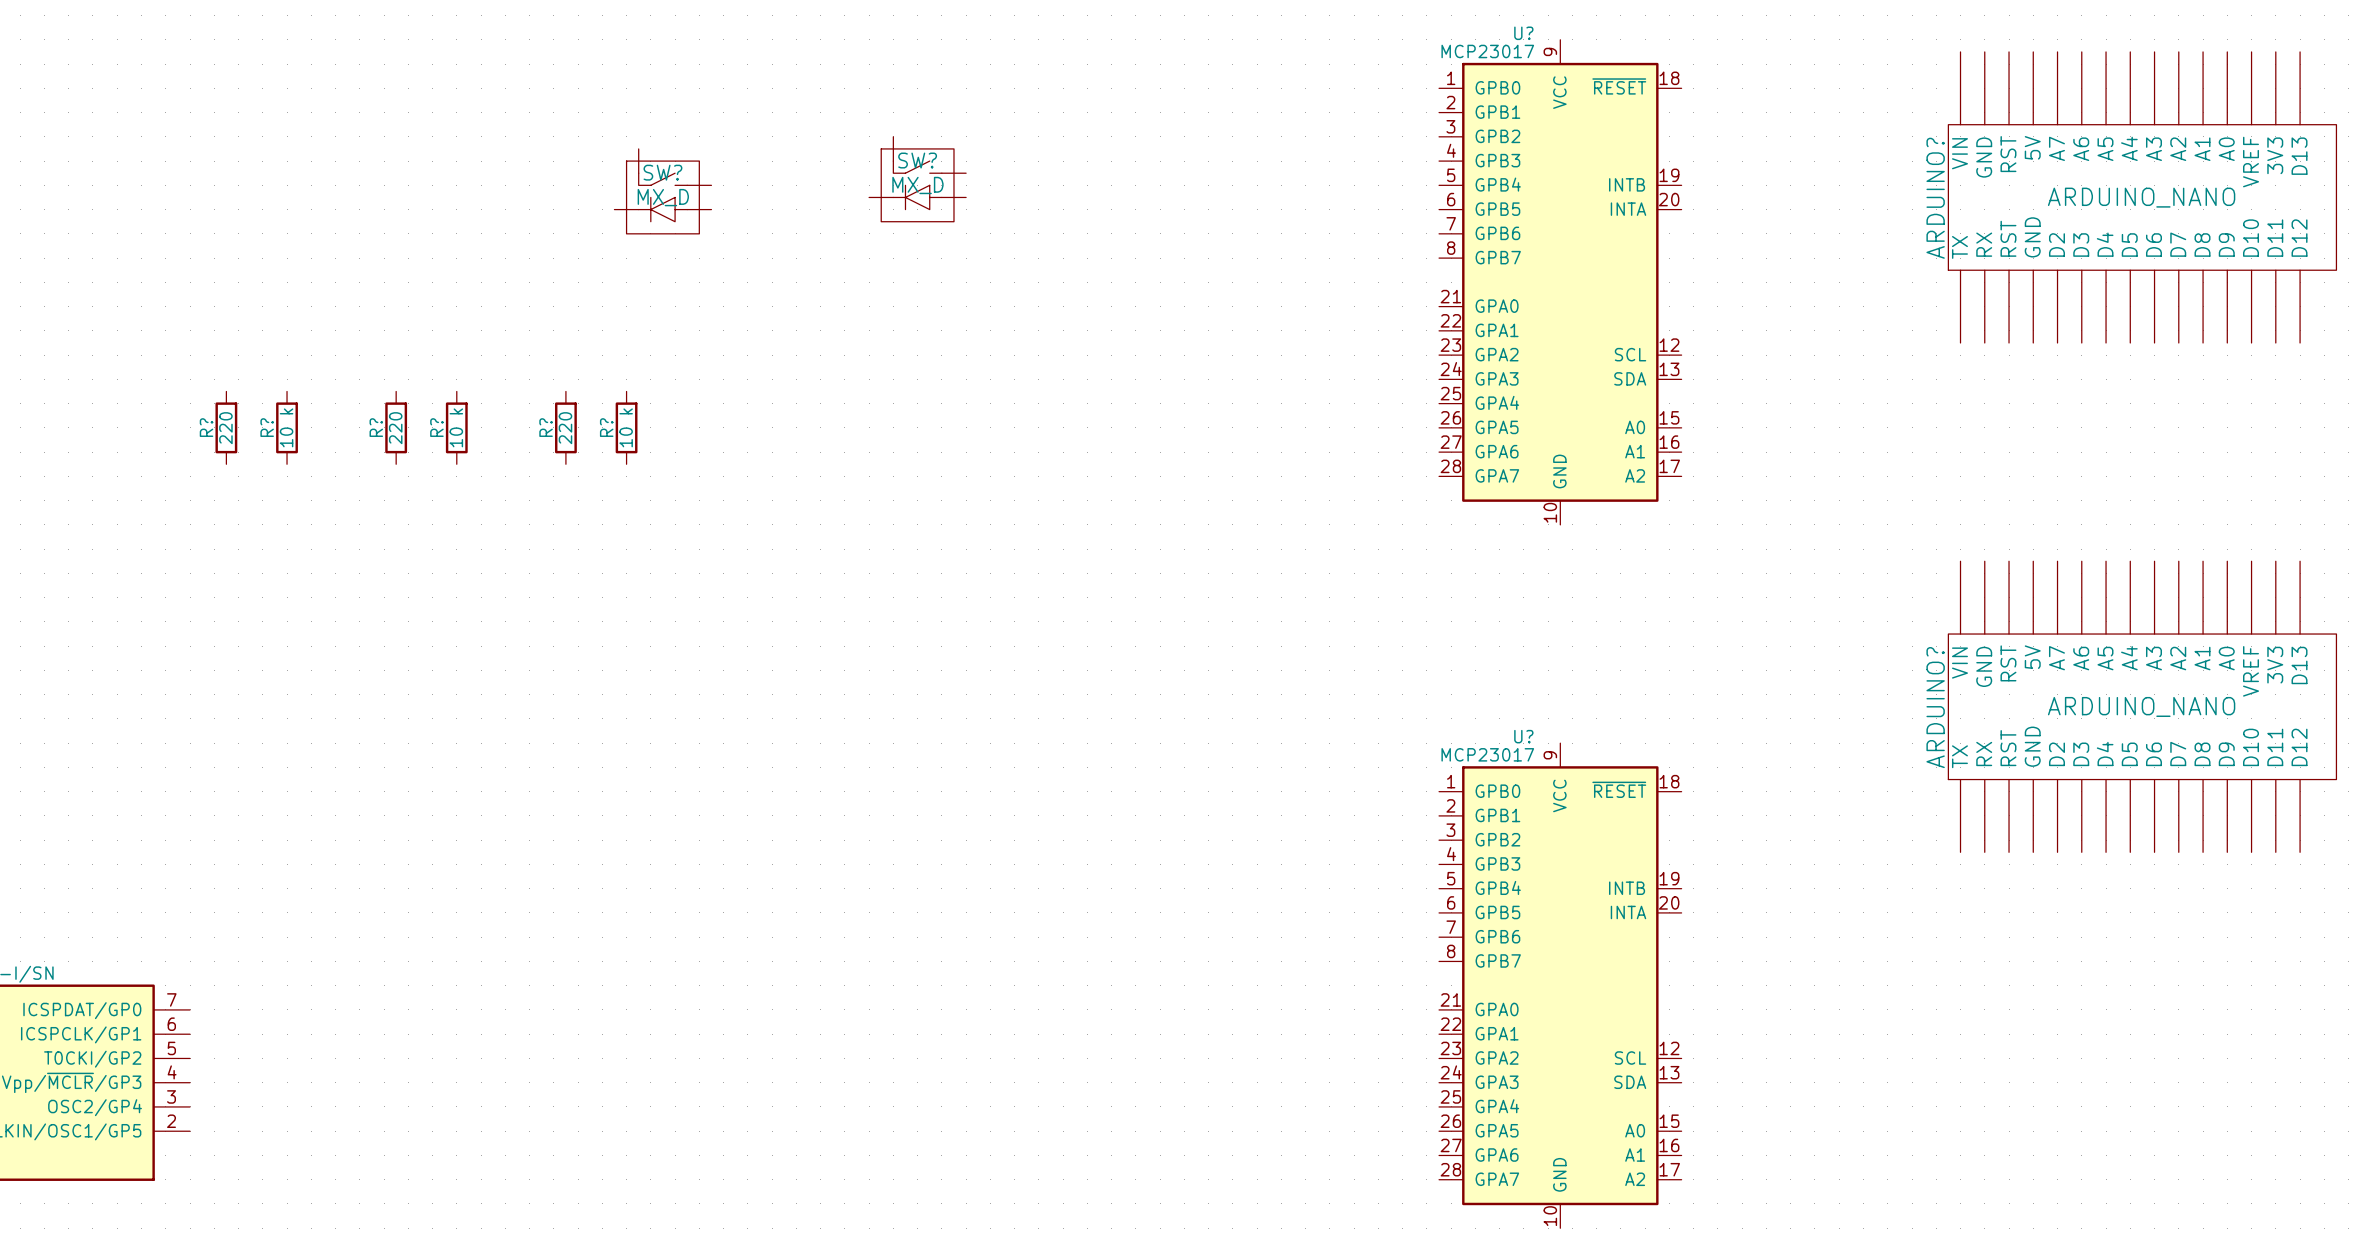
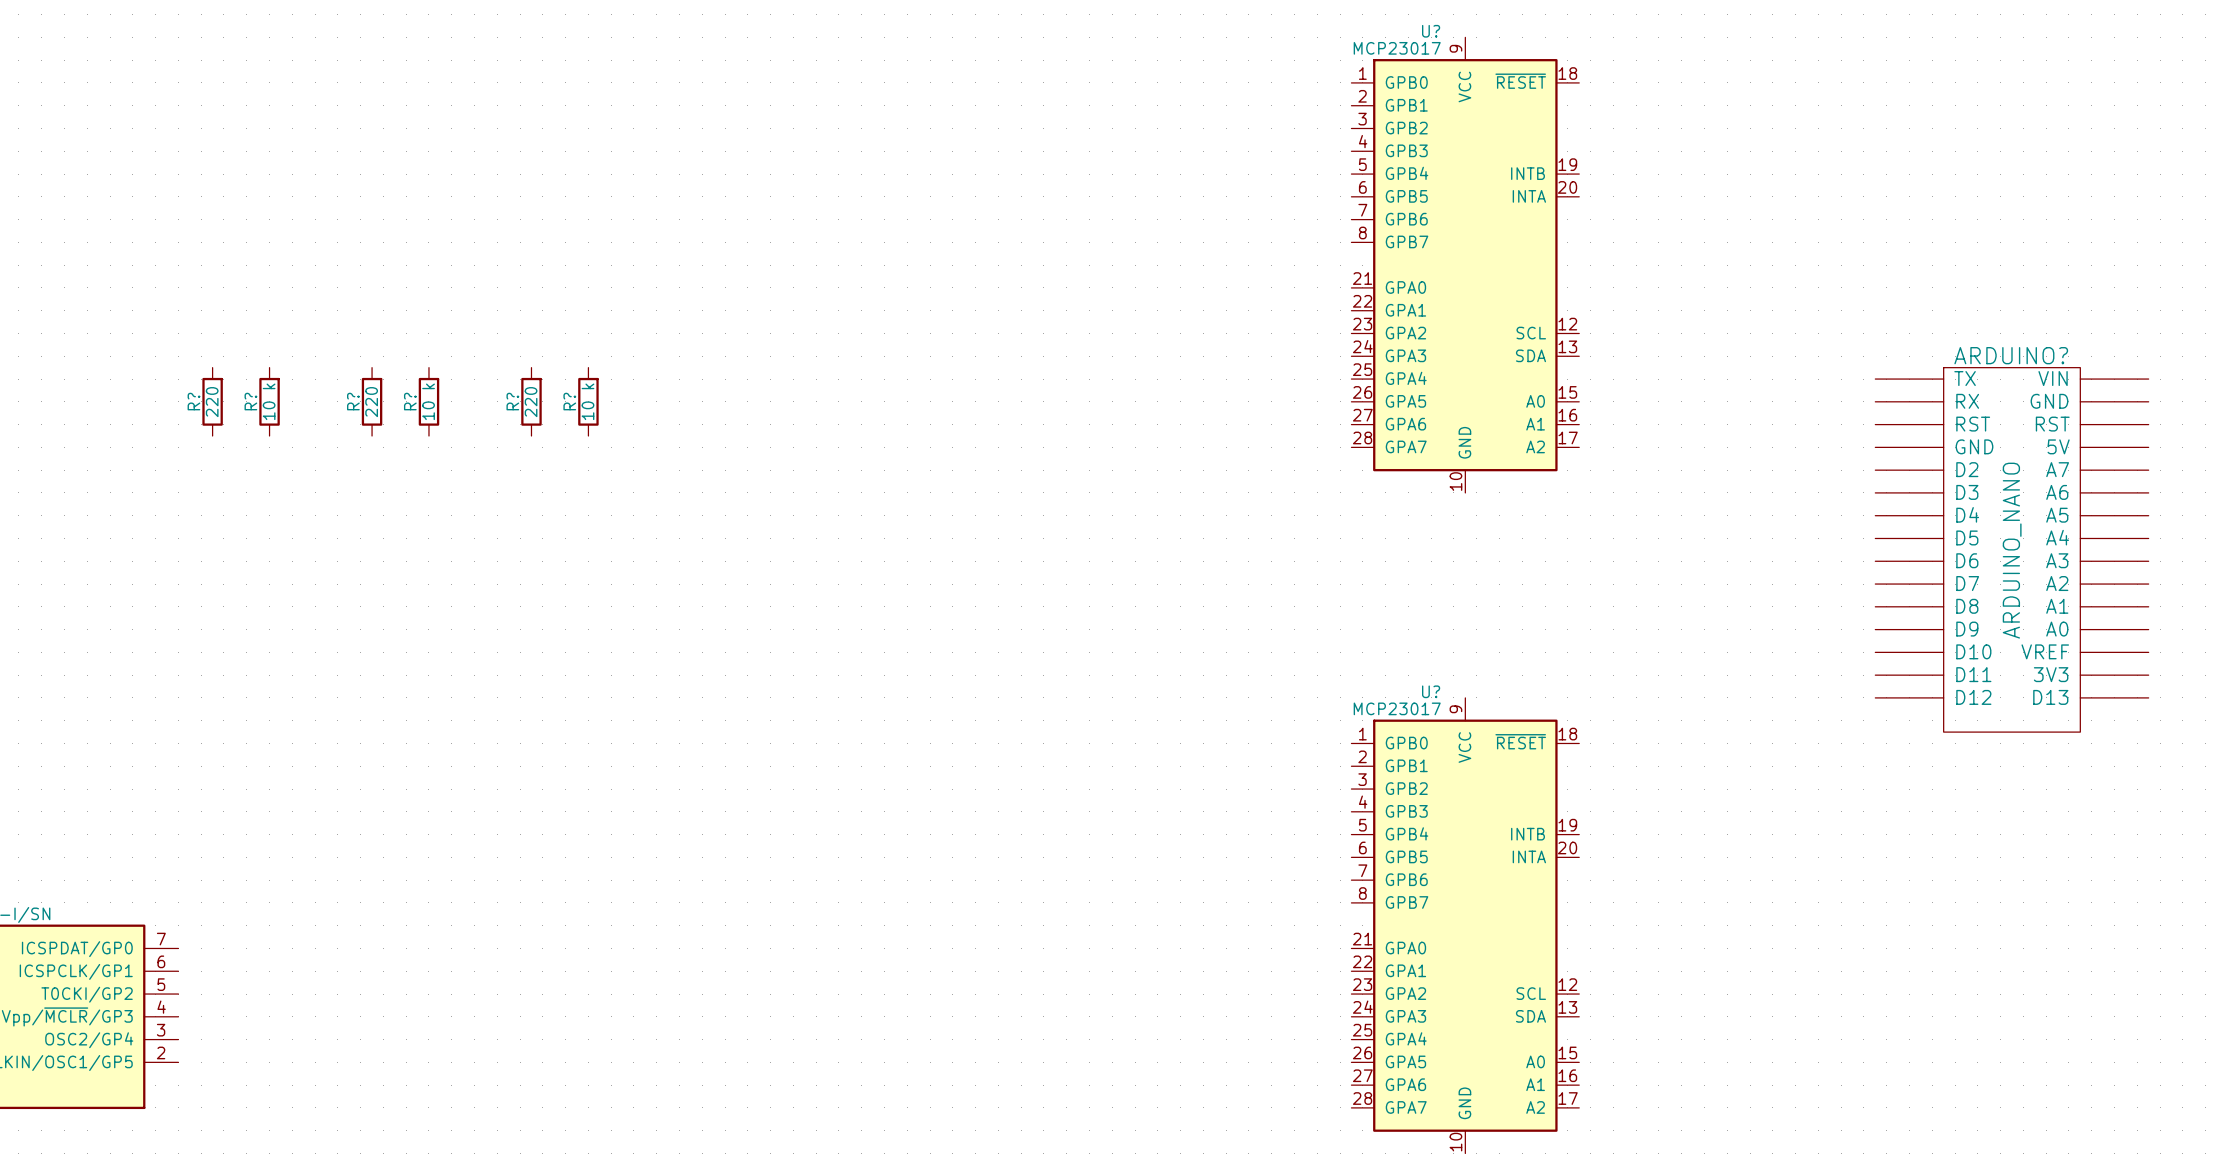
SW?: MX_D (917, 179) -> none
SW?: MX_D (662, 191) -> none
ARDUINO?: ARDUINO_NANO (2142, 197) -> none
ARDUINO? rotation: 0° (2142, 706) -> 90° clockwise (2011, 549)

